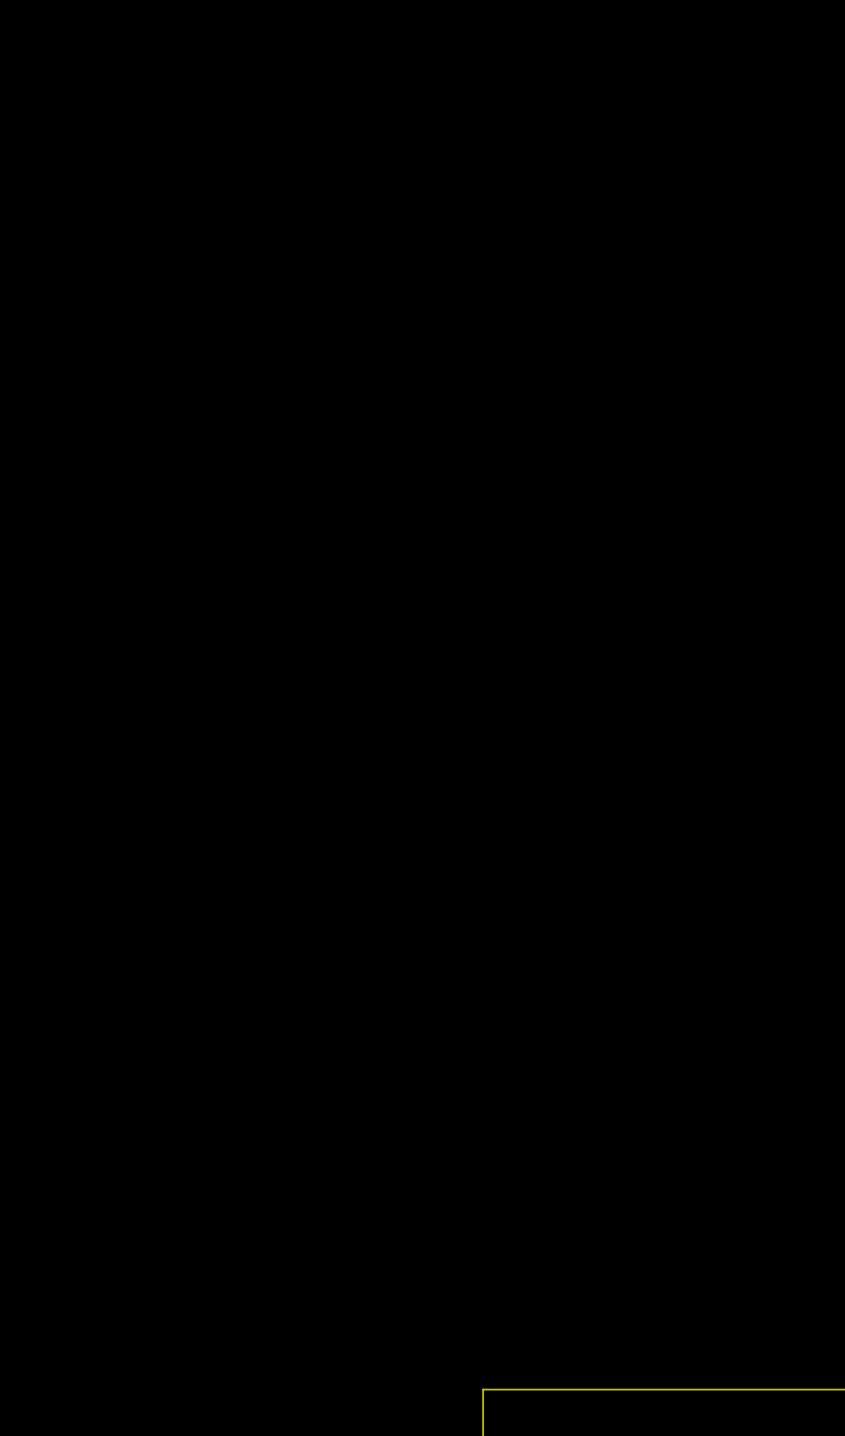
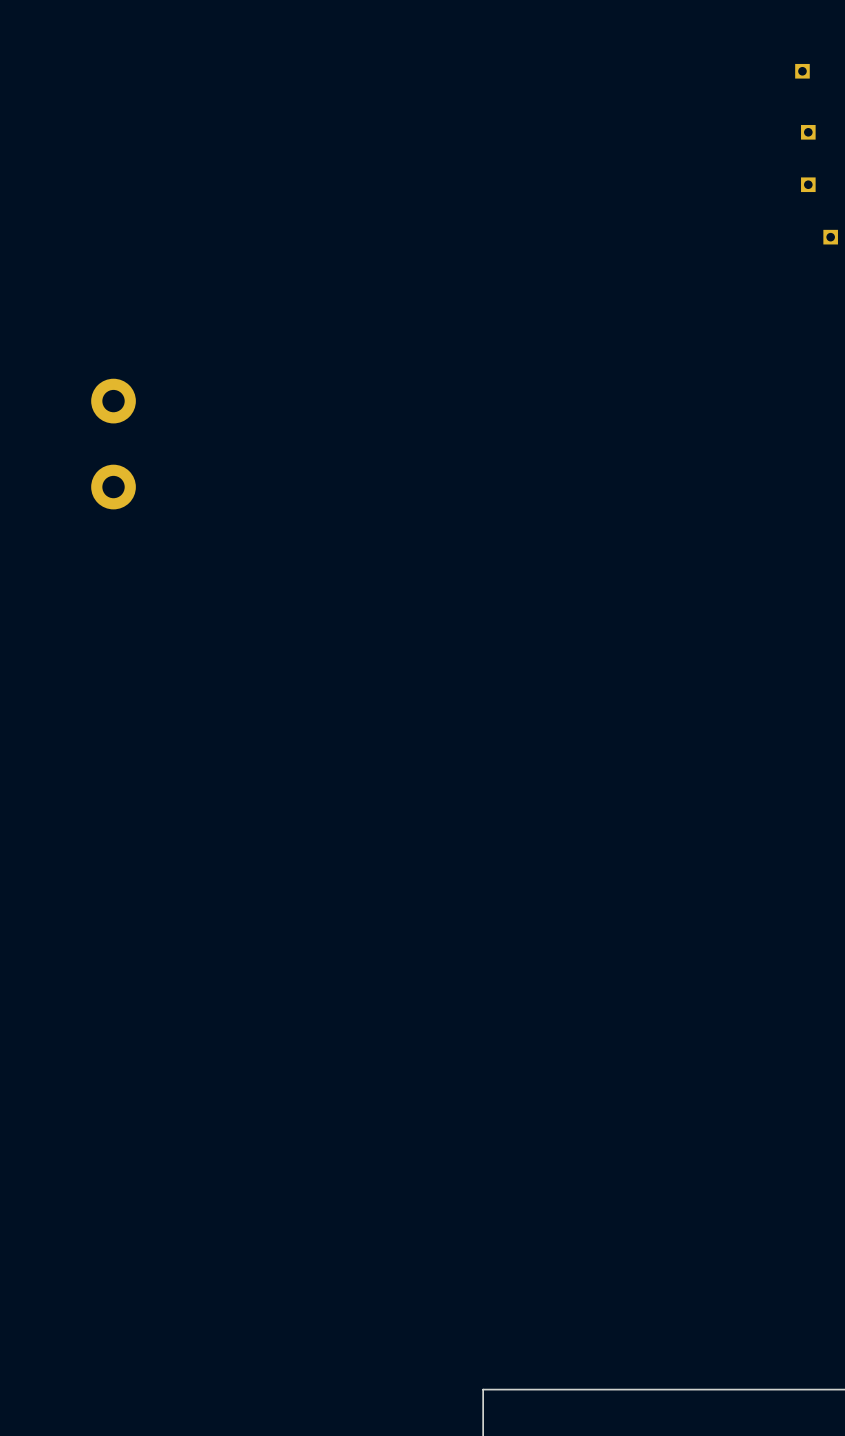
part: none -> (802, 71)
part: none -> (808, 132)
part: none -> (808, 184)
part: none -> (830, 237)
part: none -> (113, 444)

